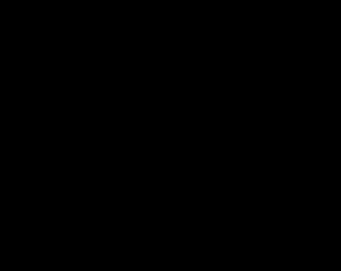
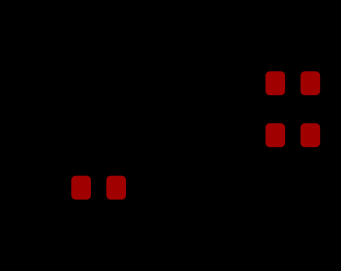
part: none -> (292, 83)
part: none -> (292, 135)
part: none -> (98, 187)

